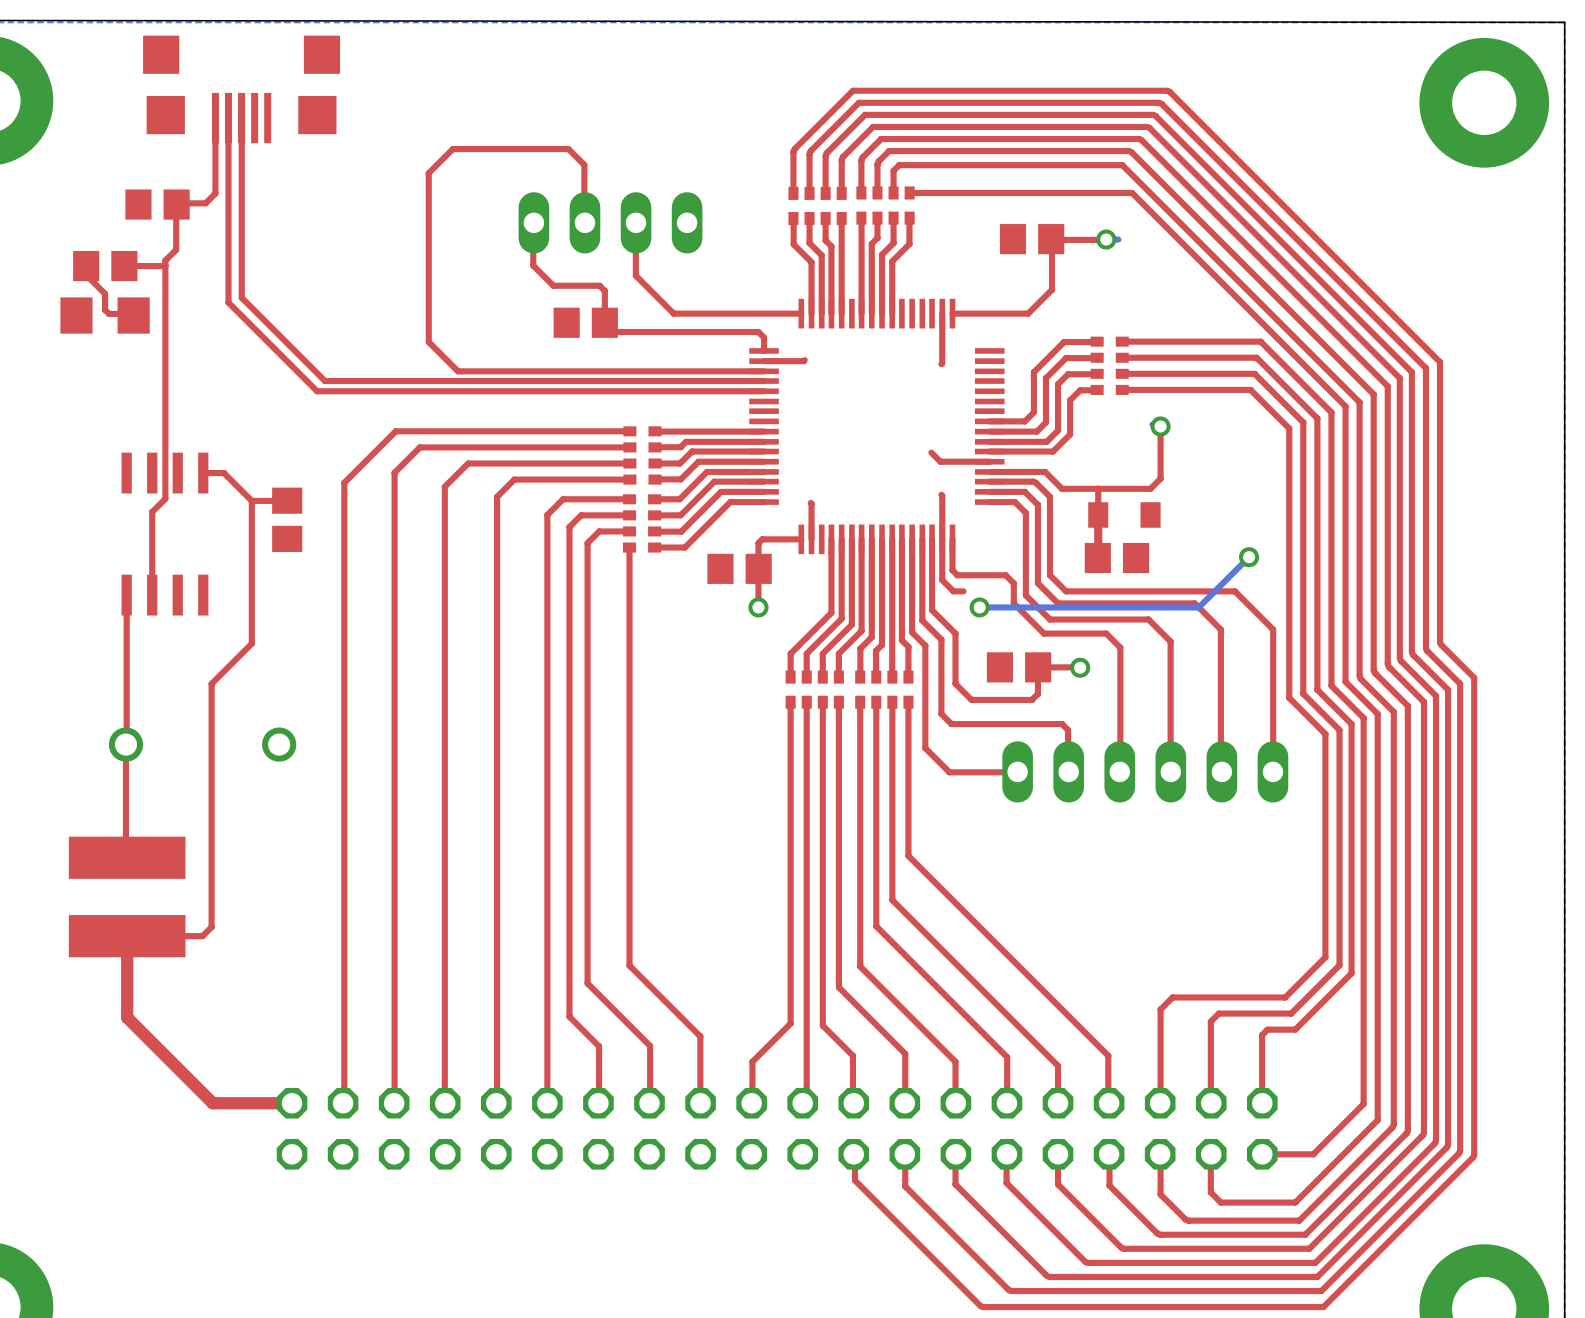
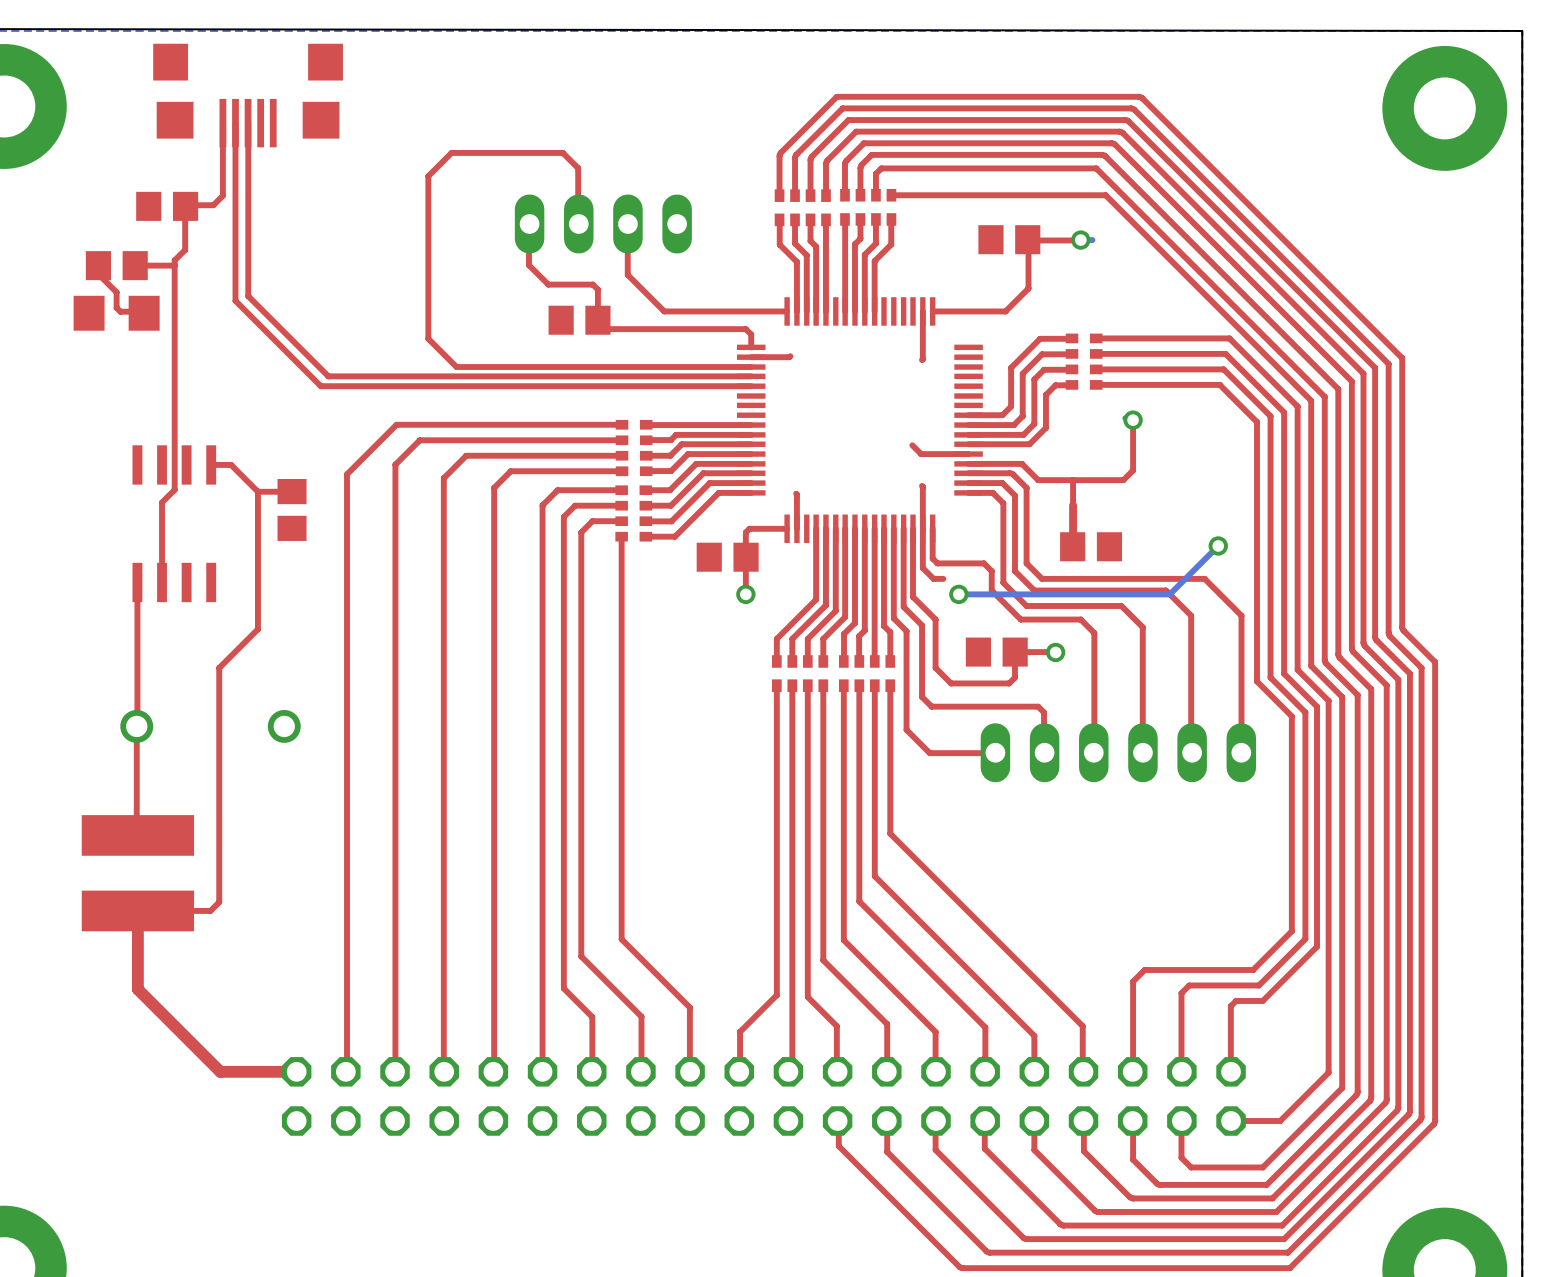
part: (1124, 514) -> none

